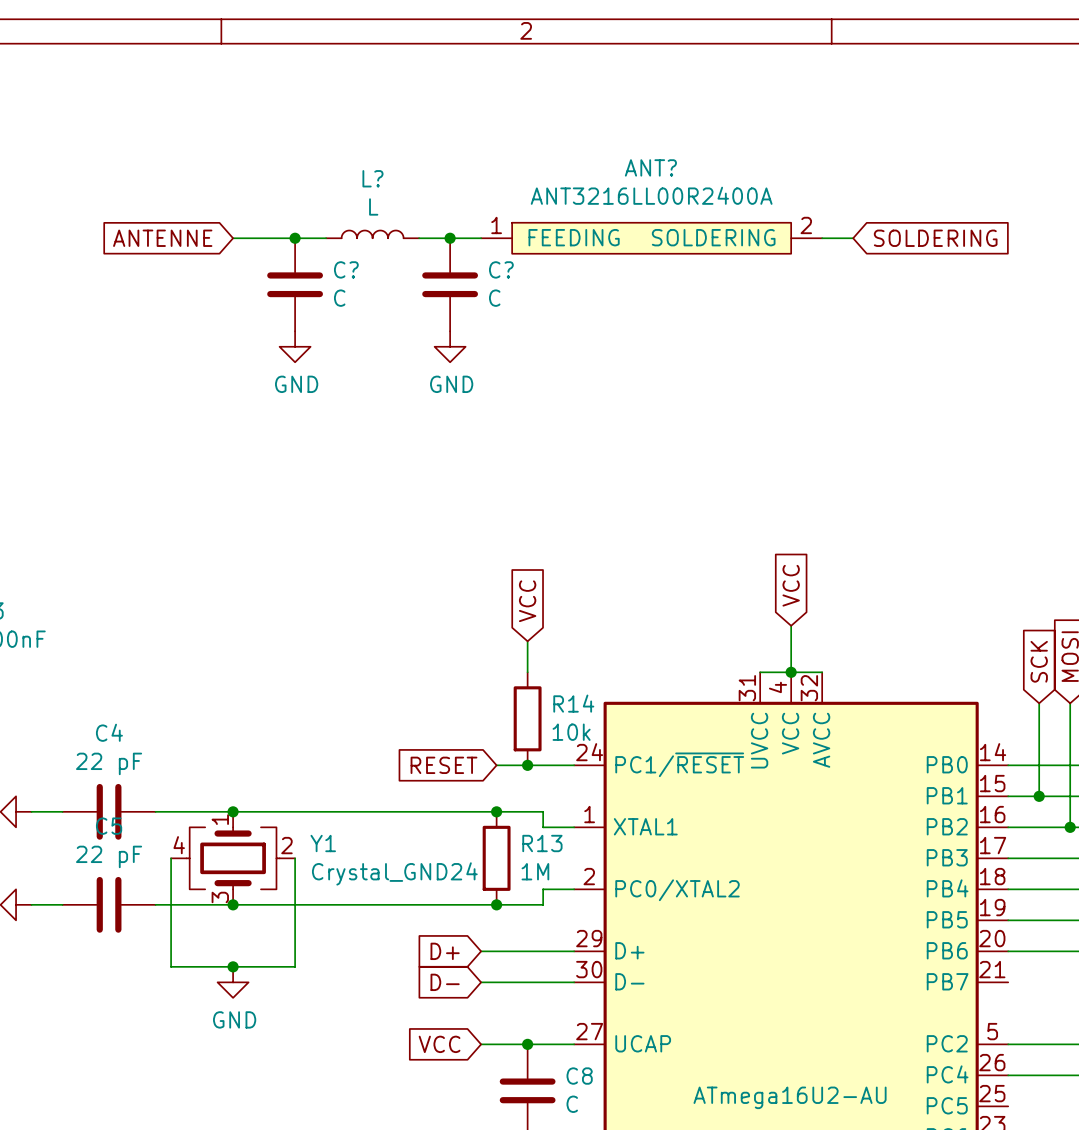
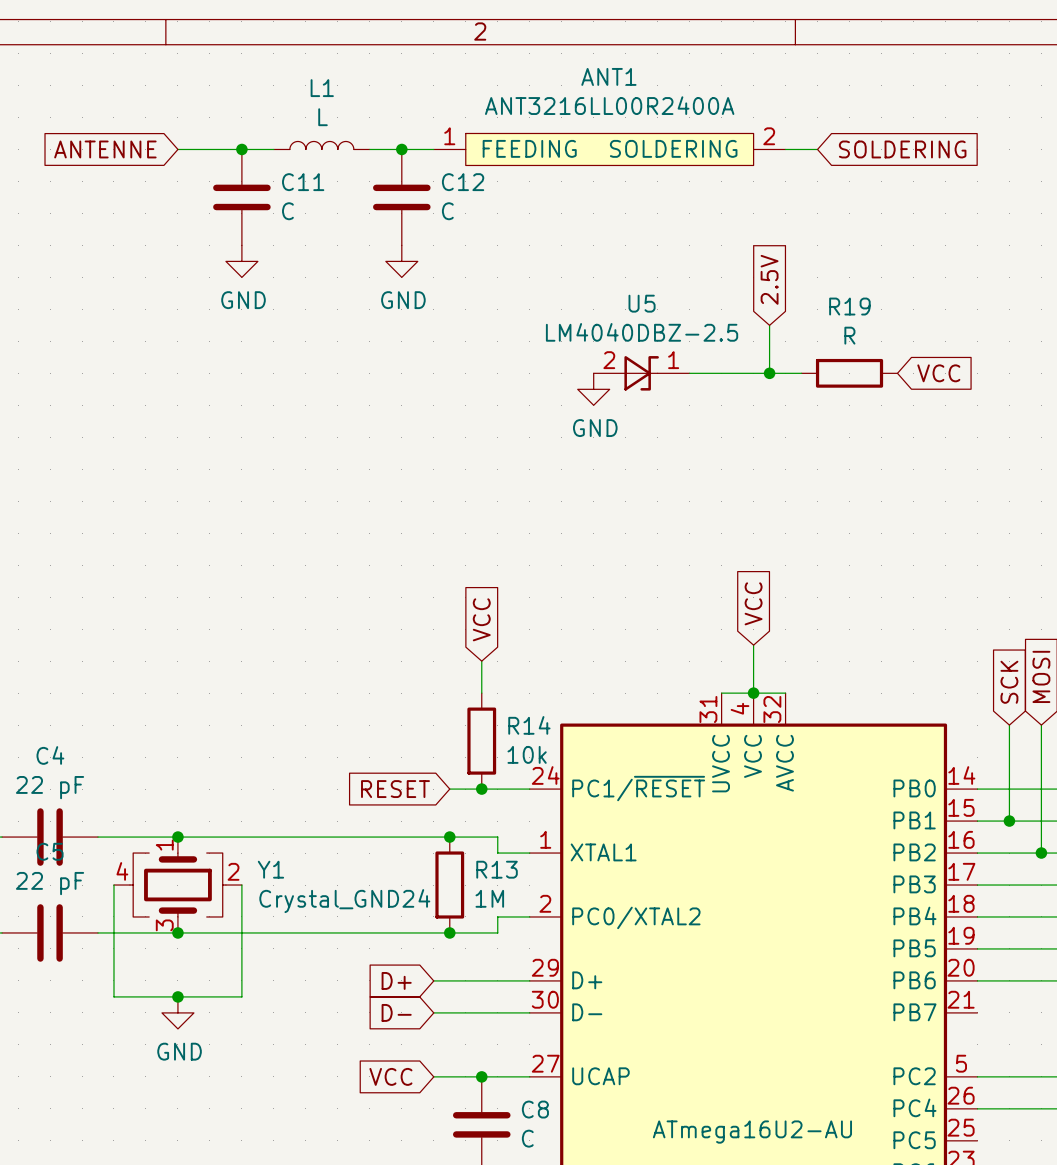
L1: none -> L (321, 145)
junction: none -> (241, 149)
junction: none -> (401, 149)
ANT1: none -> ANT3216LL00R2400A (609, 149)
C11: none -> C (241, 197)
C12: none -> C (401, 197)
L?: L (372, 234) -> none
global label position: ANTENNE (162, 238) -> ANTENNE (105, 149)
wire: (233, 238) (326, 238) -> (177, 149) (273, 149)
junction: (295, 238) -> none
wire: (419, 238) (481, 238) -> (369, 149) (433, 149)
junction: (450, 238) -> none
ANT?: ANT3216LL00R2400A (651, 238) -> none
wire: (822, 238) (853, 238) -> (785, 149) (817, 149)
global label position: SOLDERING (935, 238) -> SOLDERING (902, 149)
power symbol: none -> GND (241, 261)
power symbol: none -> GND (401, 261)
global label: none -> 2.5V (769, 279)
C?: C (295, 284) -> none
C?: C (450, 284) -> none
wire: none -> (769, 325) (769, 373)
power symbol: GND (295, 346) -> none
power symbol: GND (450, 346) -> none
U5: none -> LM4040DBZ-2.5 (641, 373)
wire: none -> (689, 373) (801, 373)
junction: none -> (769, 373)
R19: none -> R (849, 373)
global label: none -> VCC (938, 373)
power symbol: none -> GND (593, 389)

